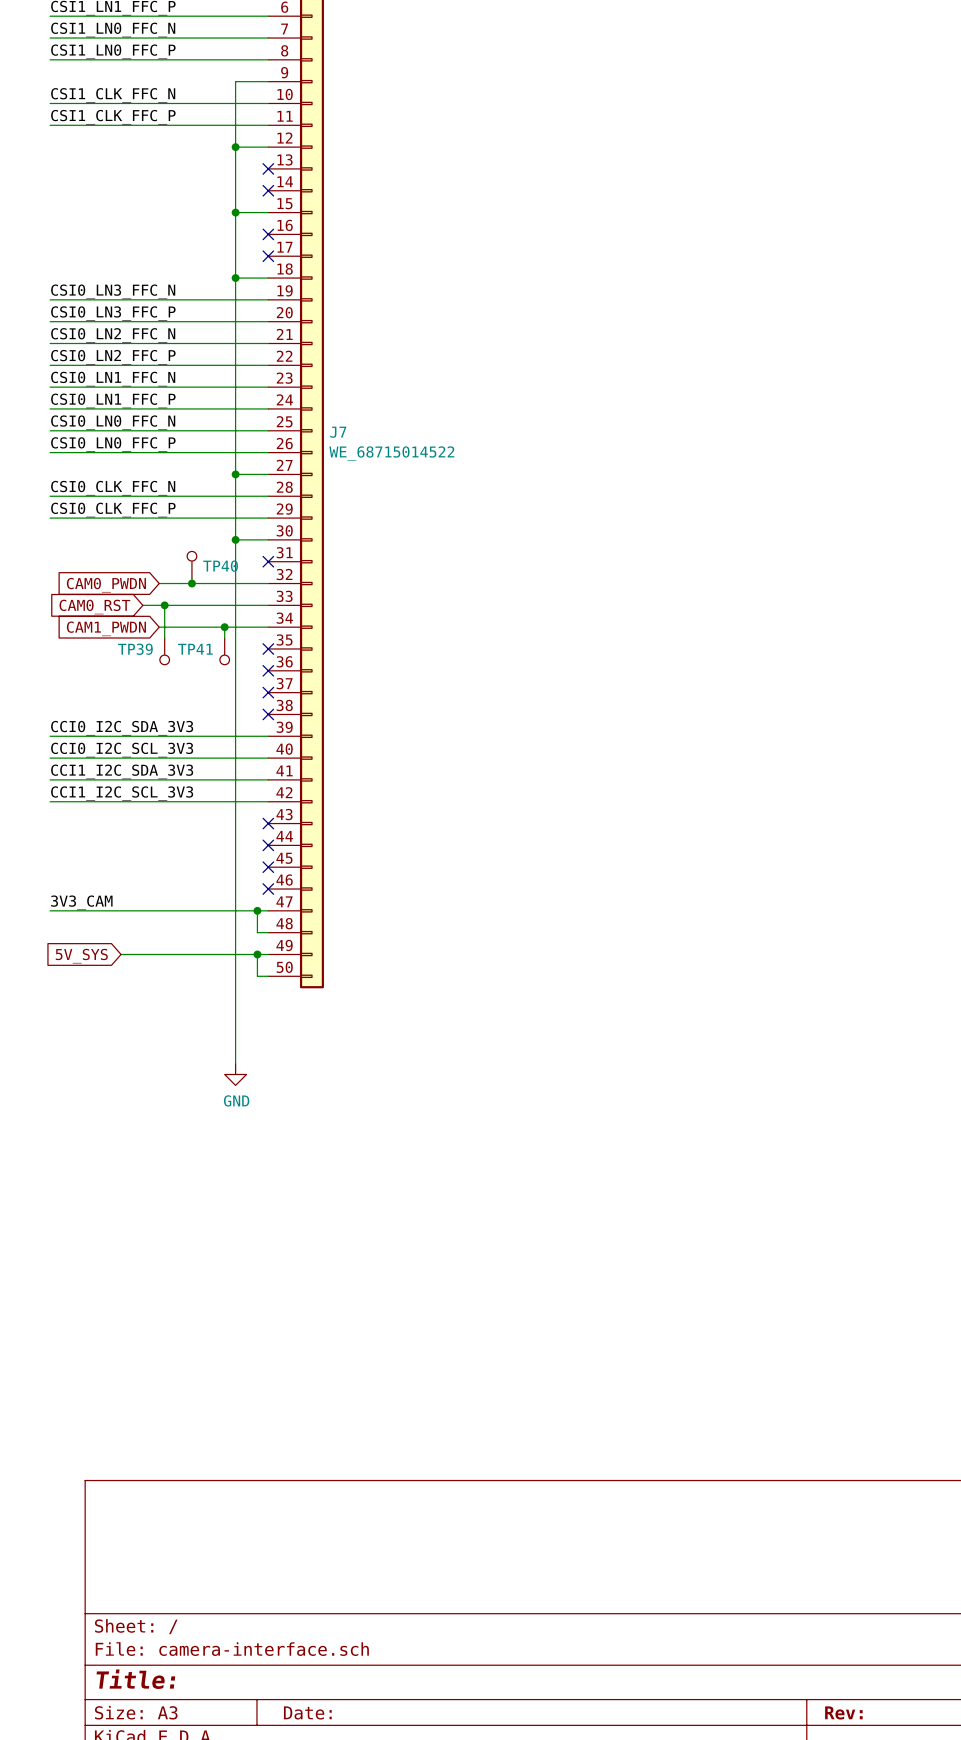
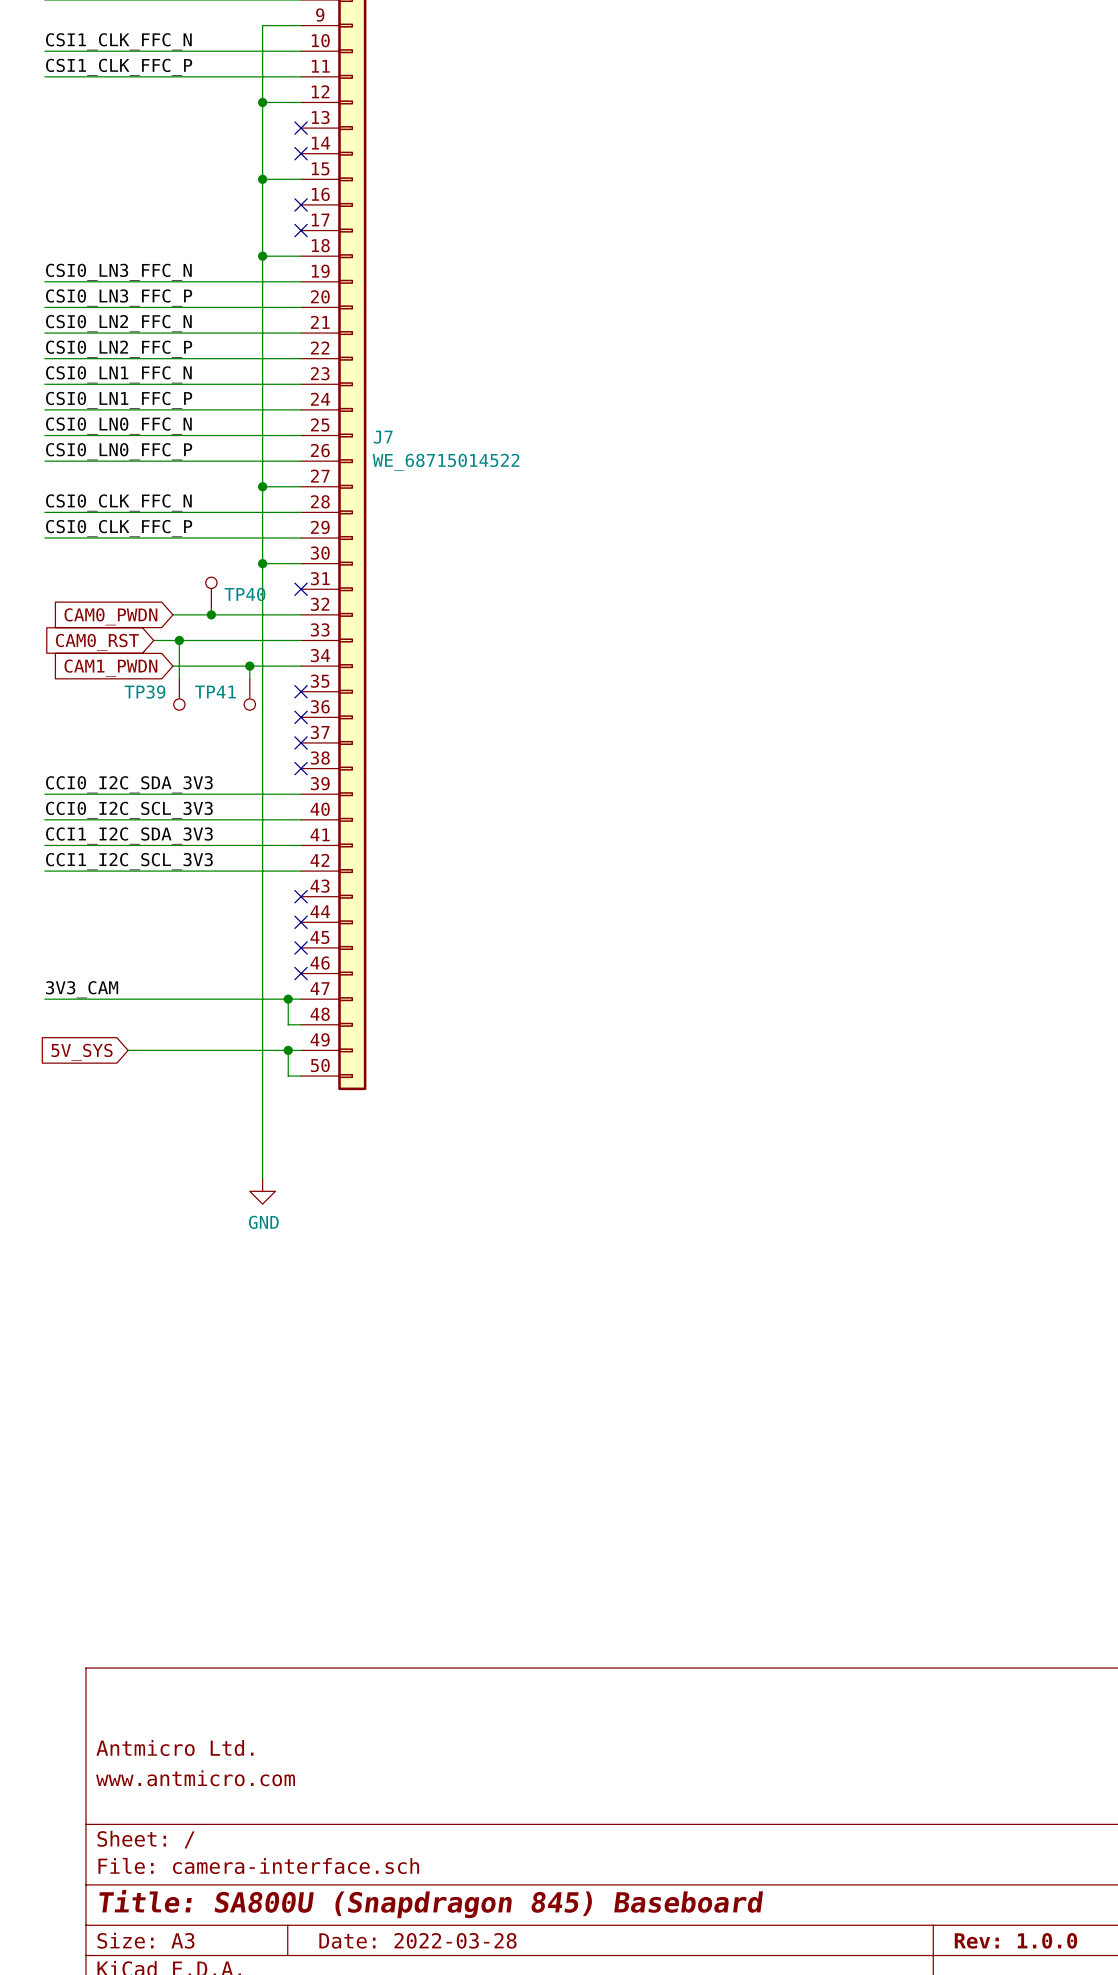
title block: none -> Antmicro Ltd. (174, 1748)
title block: none -> www.antmicro.com (195, 1778)
title block: Title: (135, 1679) -> Title: SA800U (Snapdragon 845) Baseboard (431, 1904)
title block: Date: (307, 1712) -> Date: 2022-03-28 (417, 1940)
title block: Rev: (843, 1712) -> Rev: 1.0.0 (1015, 1940)

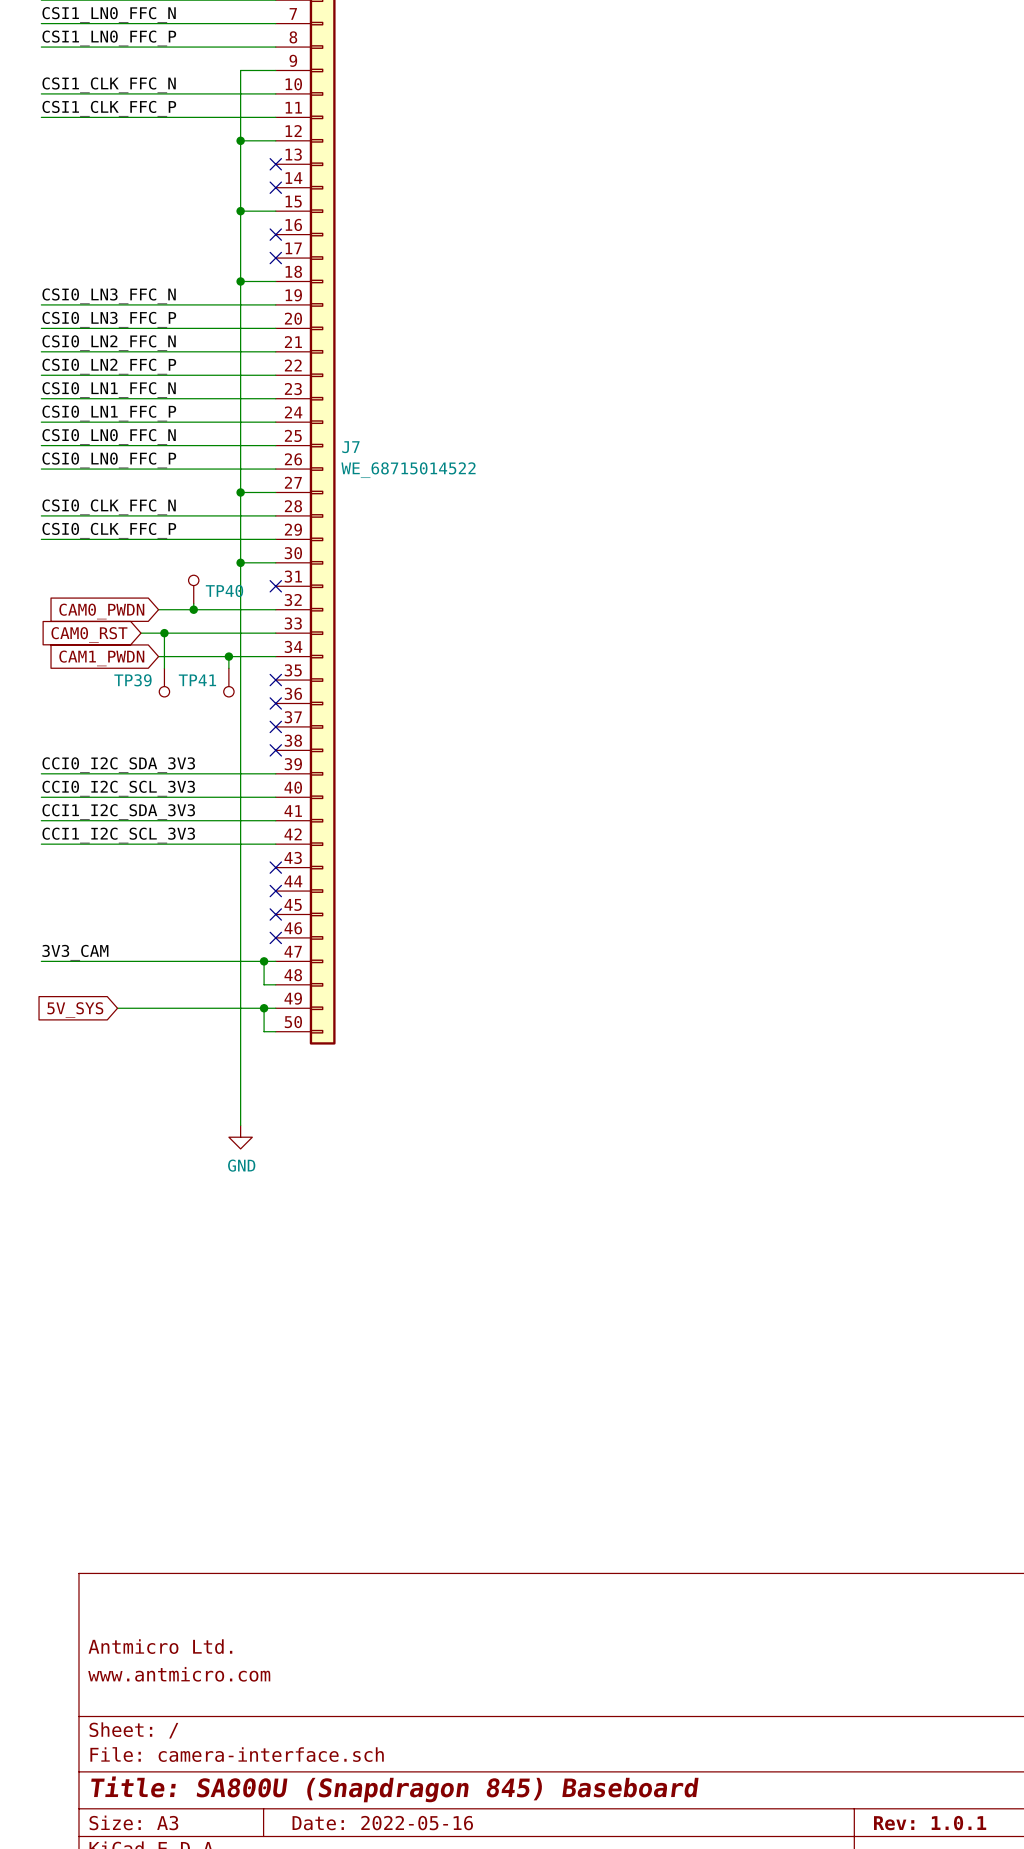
title block: Date: 2022-03-28 (417, 1940) -> Date: 2022-05-16 (382, 1823)
title block: Rev: 1.0.0 (1015, 1940) -> Rev: 1.0.1 (930, 1823)

